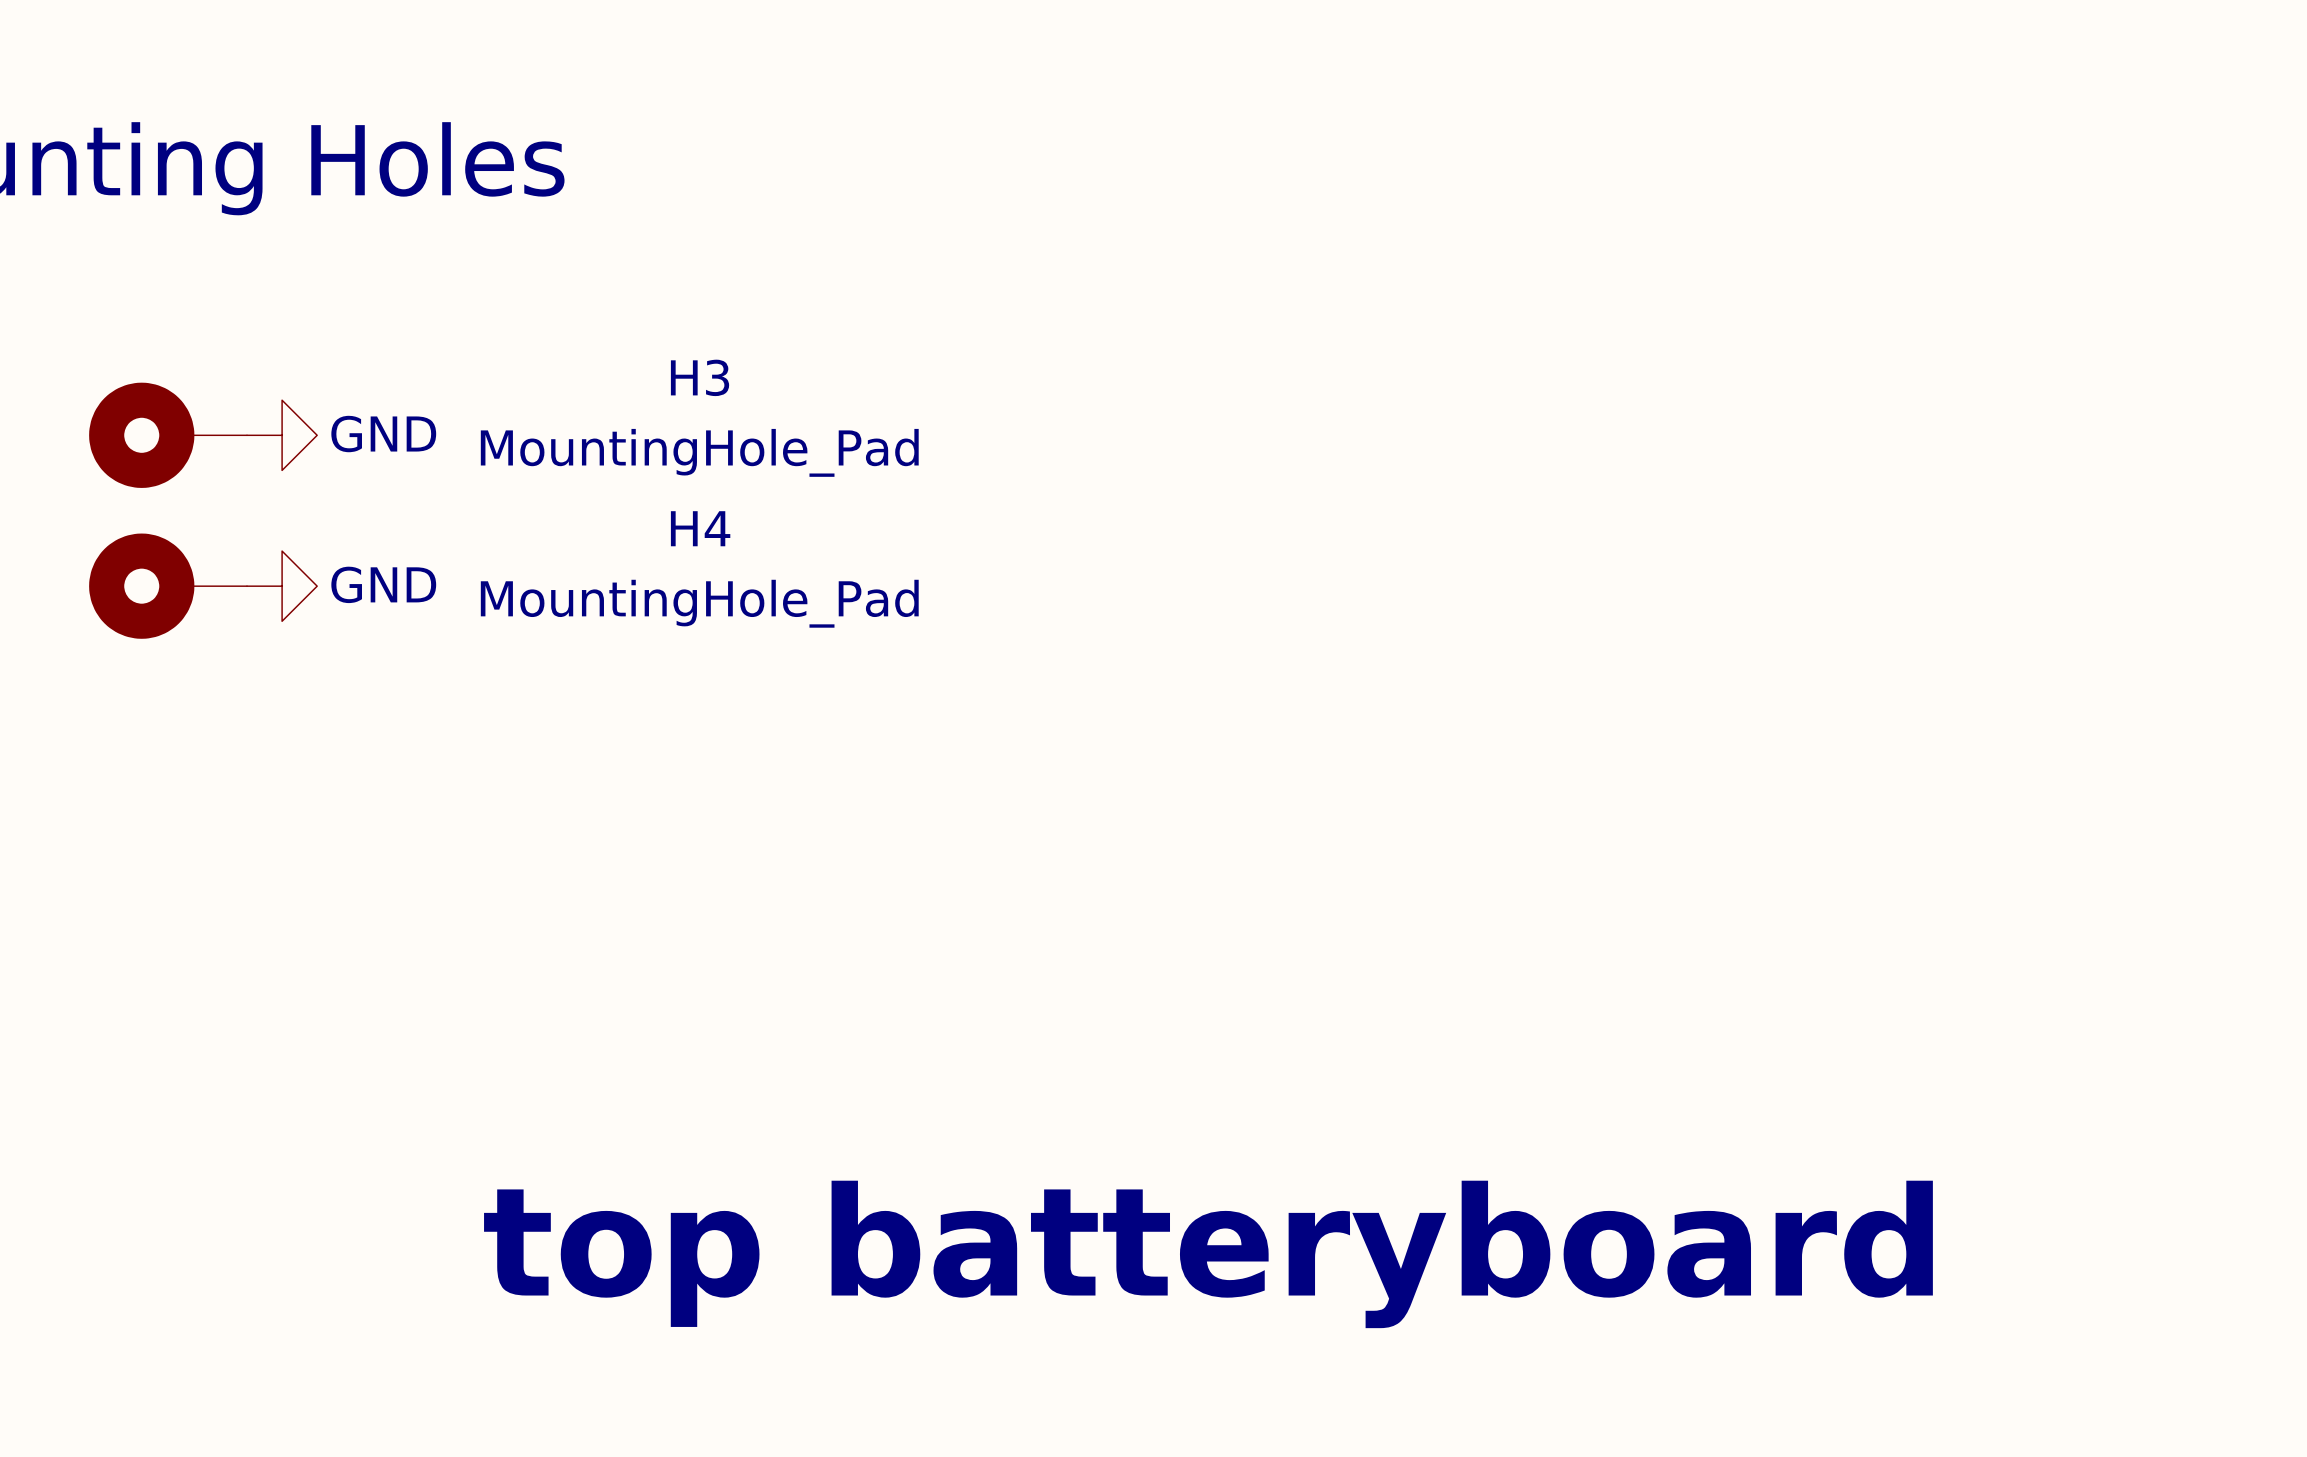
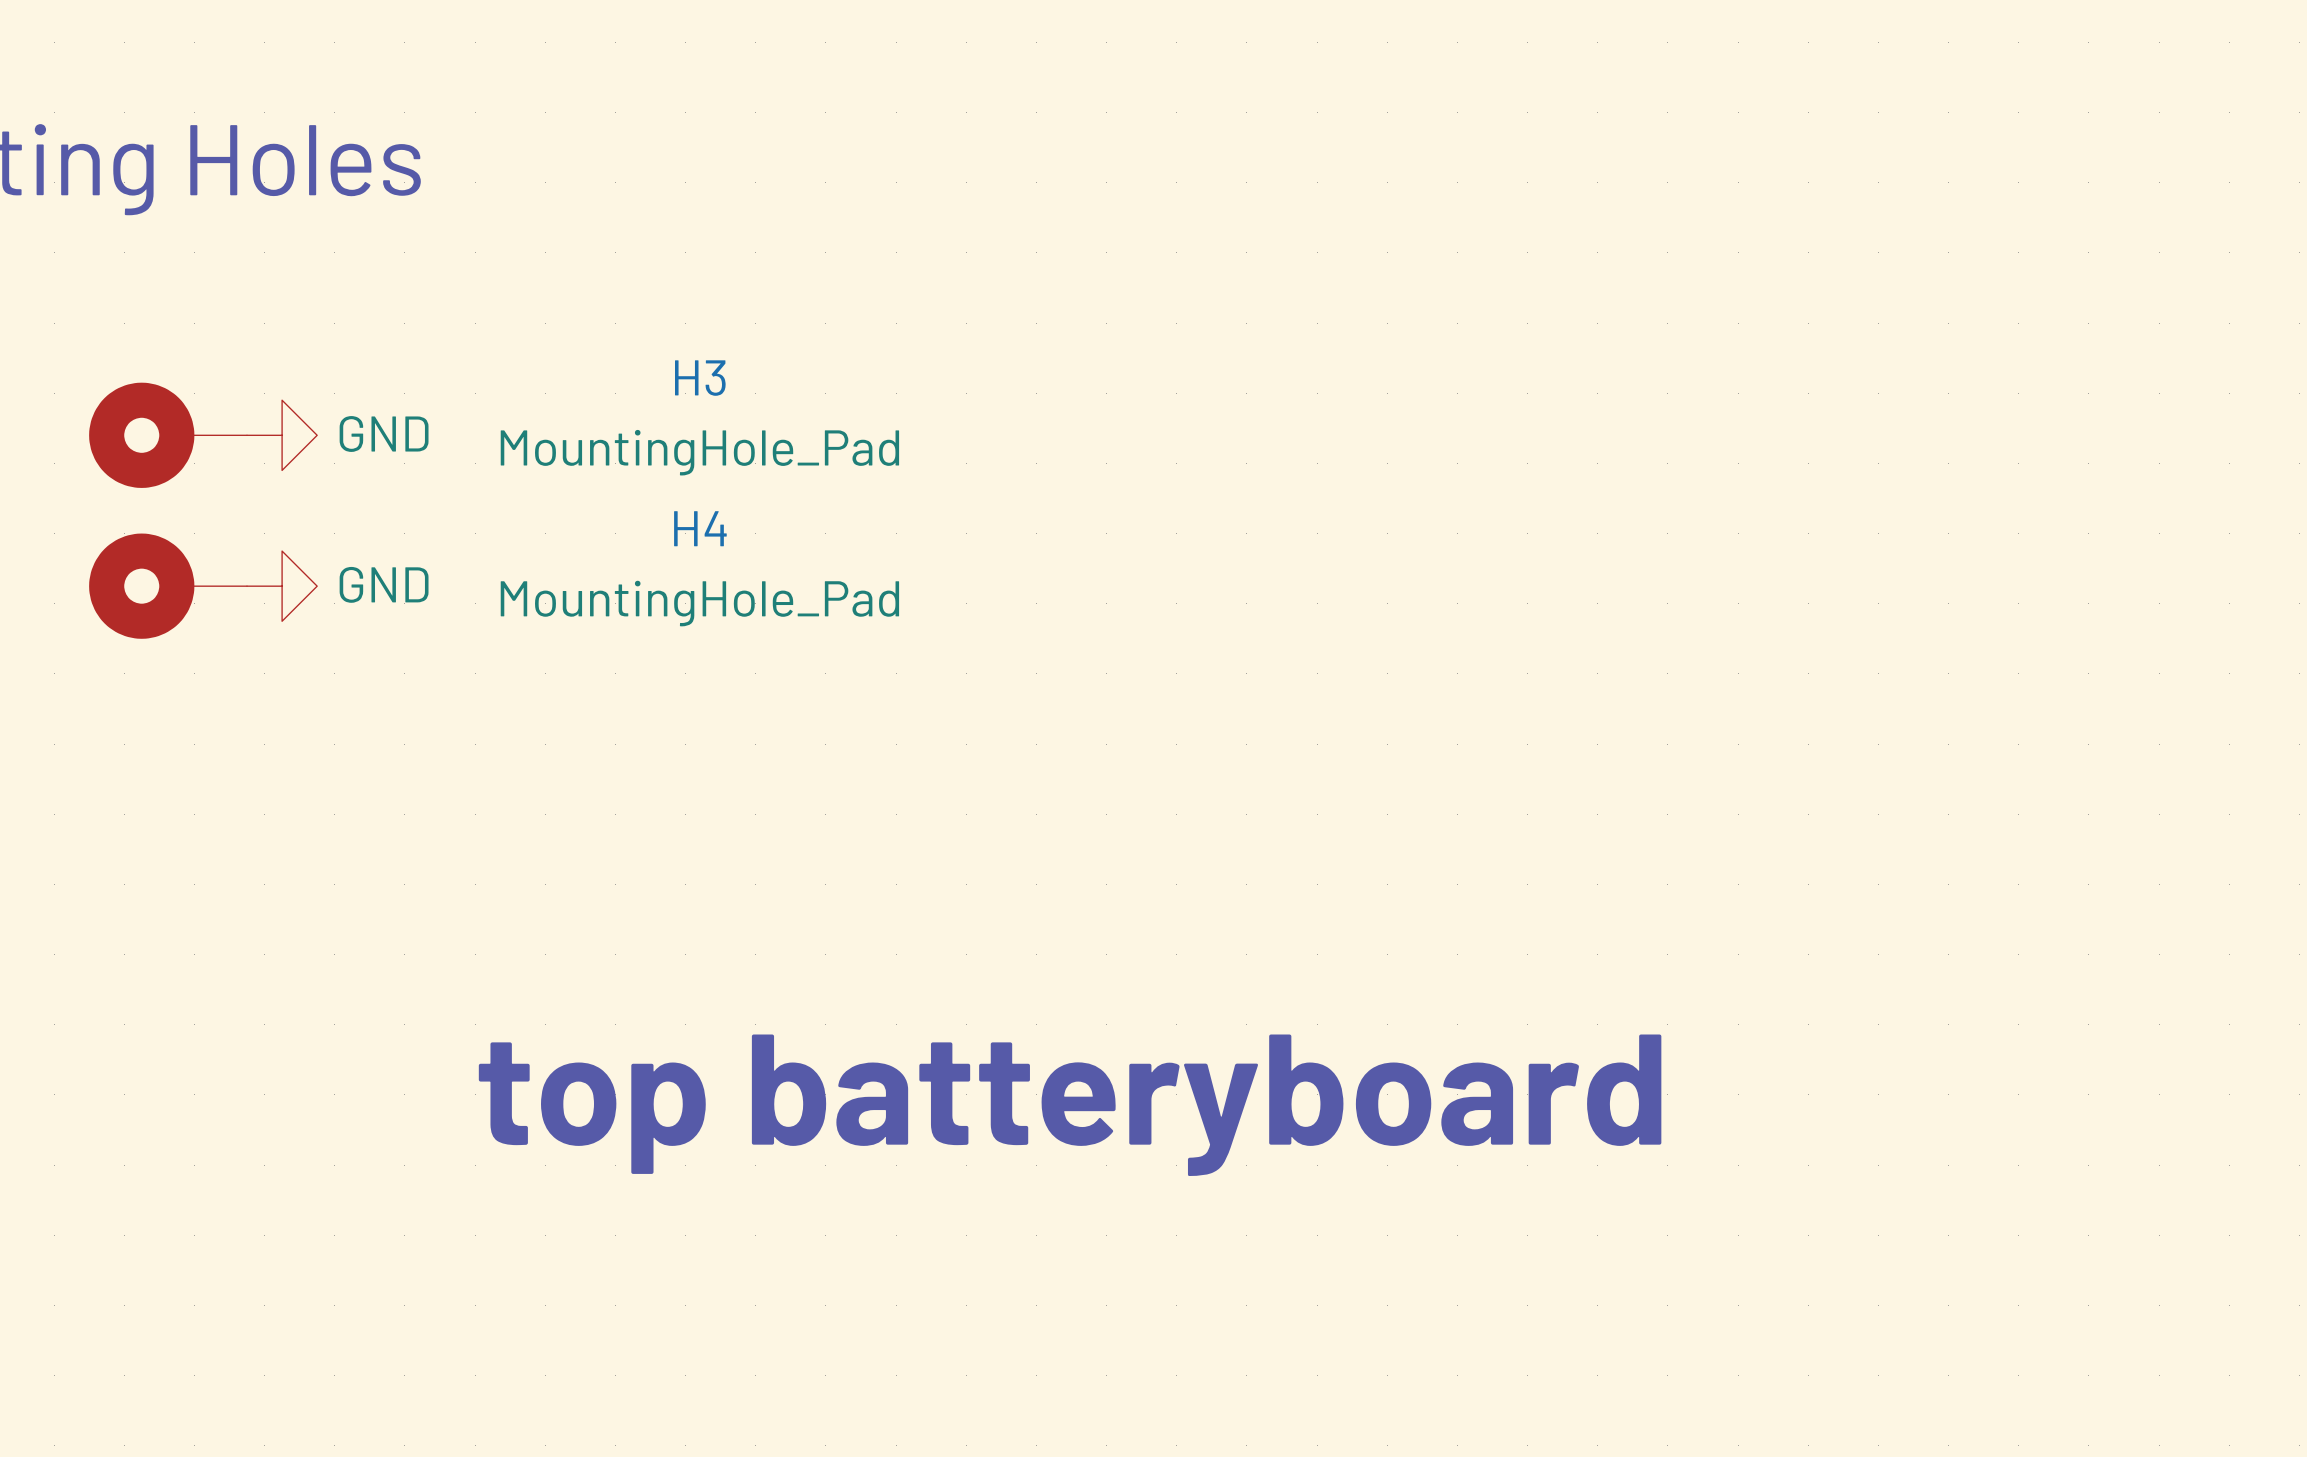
text position: top batteryboard (1208, 1254) -> top batteryboard (1070, 1105)

